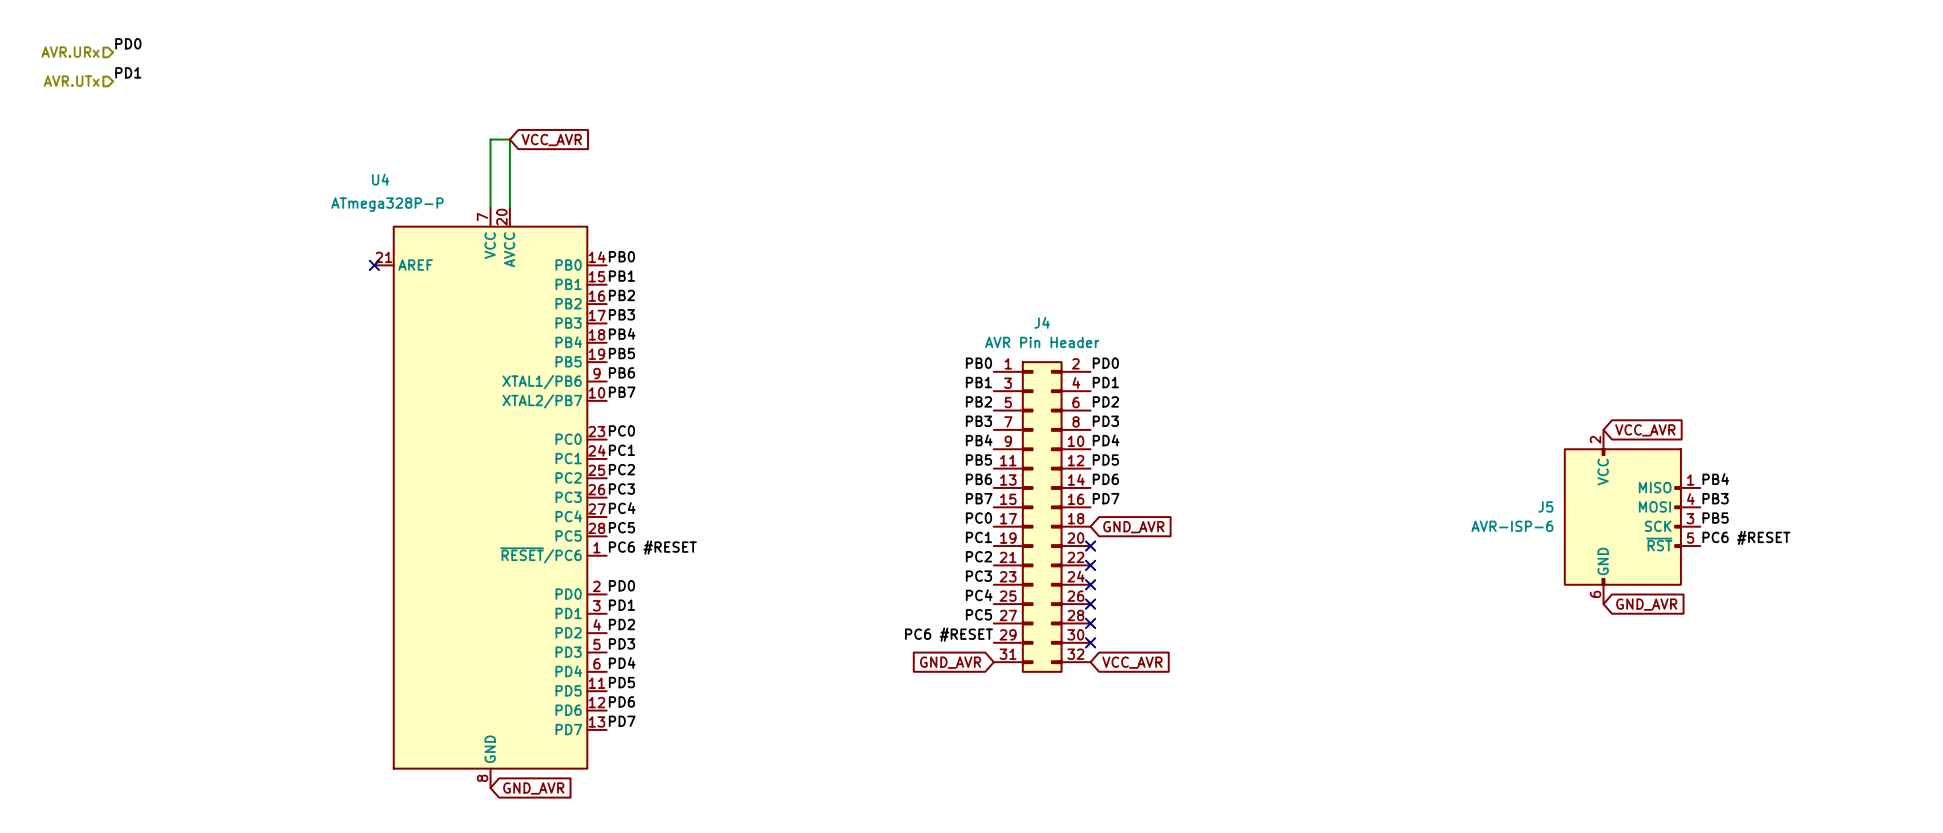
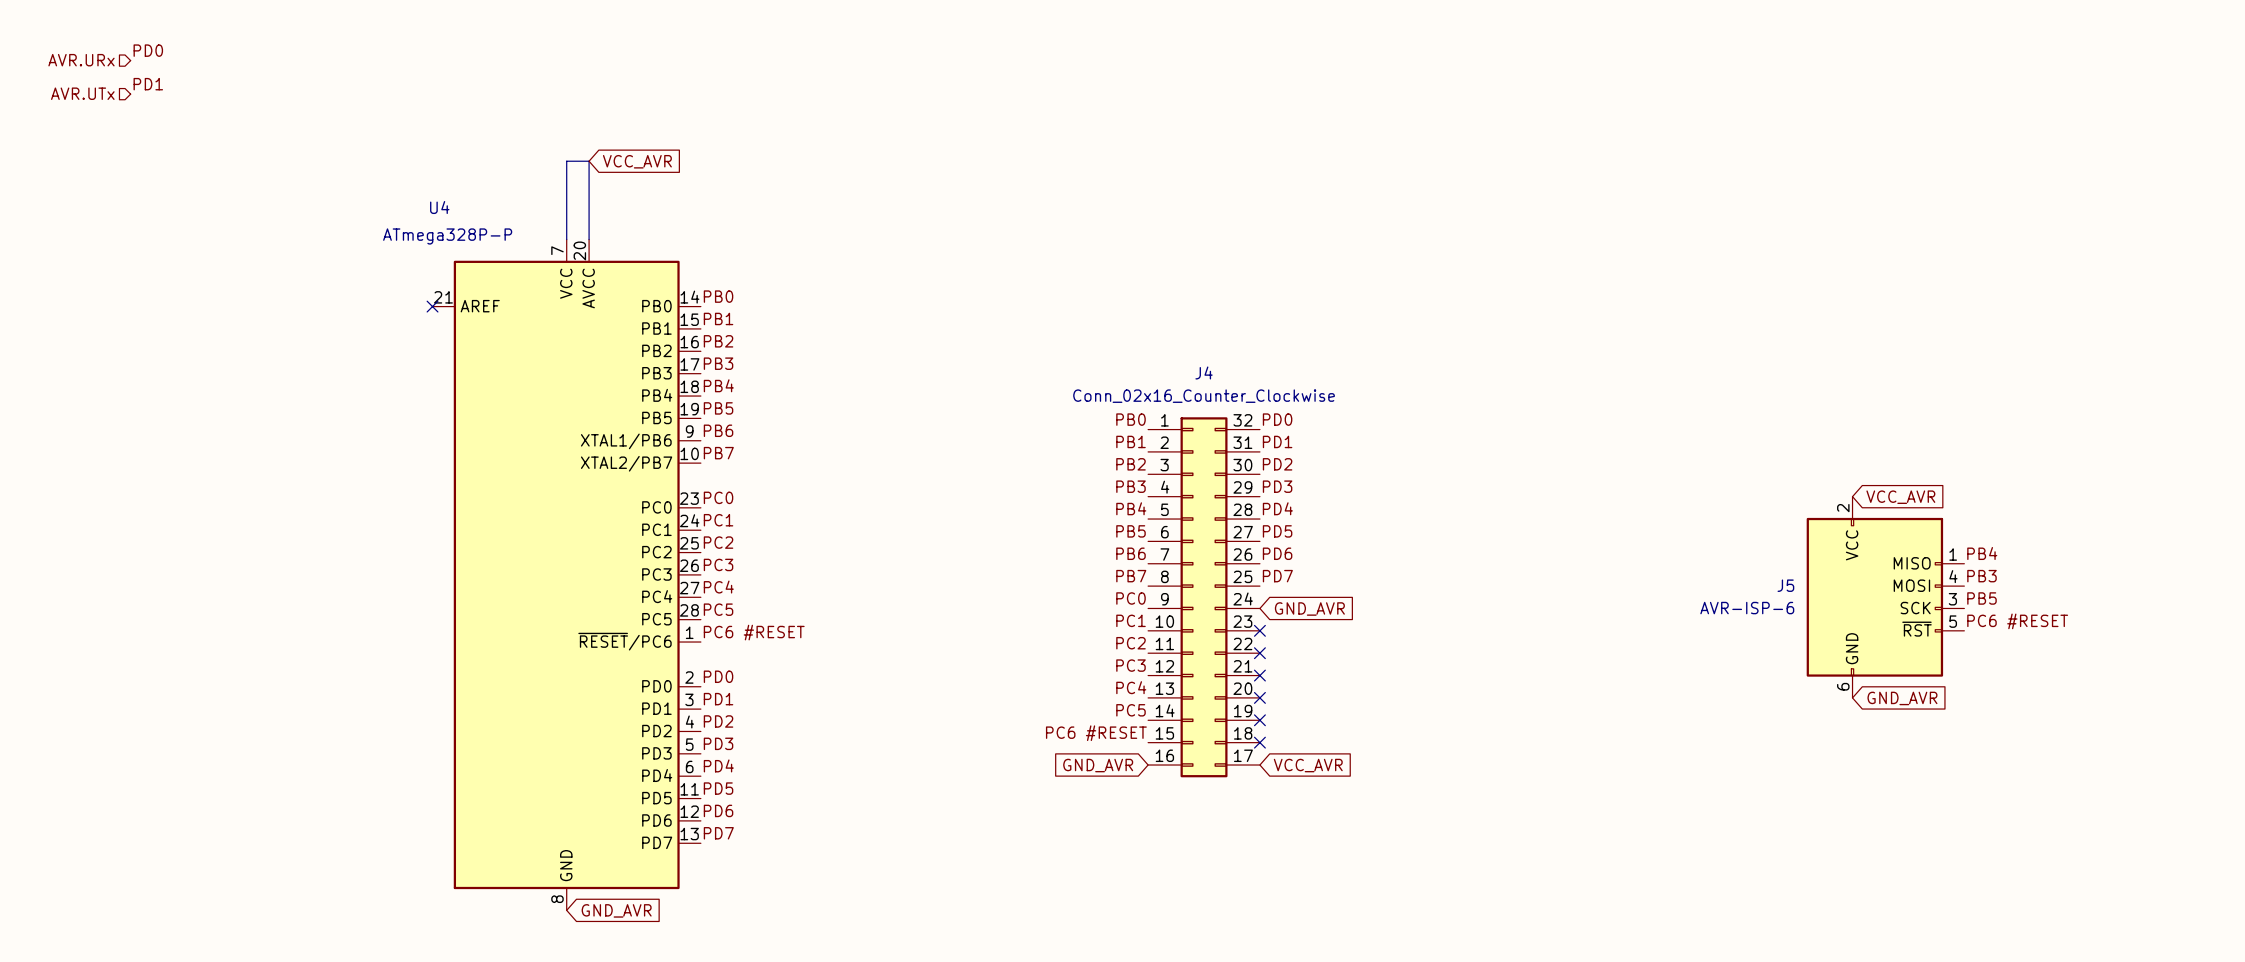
J4 value: AVR Pin Header (1042, 342) -> Conn_02x16_Counter_Clockwise (1204, 396)
J4 symbol: [993, 361, 1091, 673] -> [1148, 417, 1260, 778]

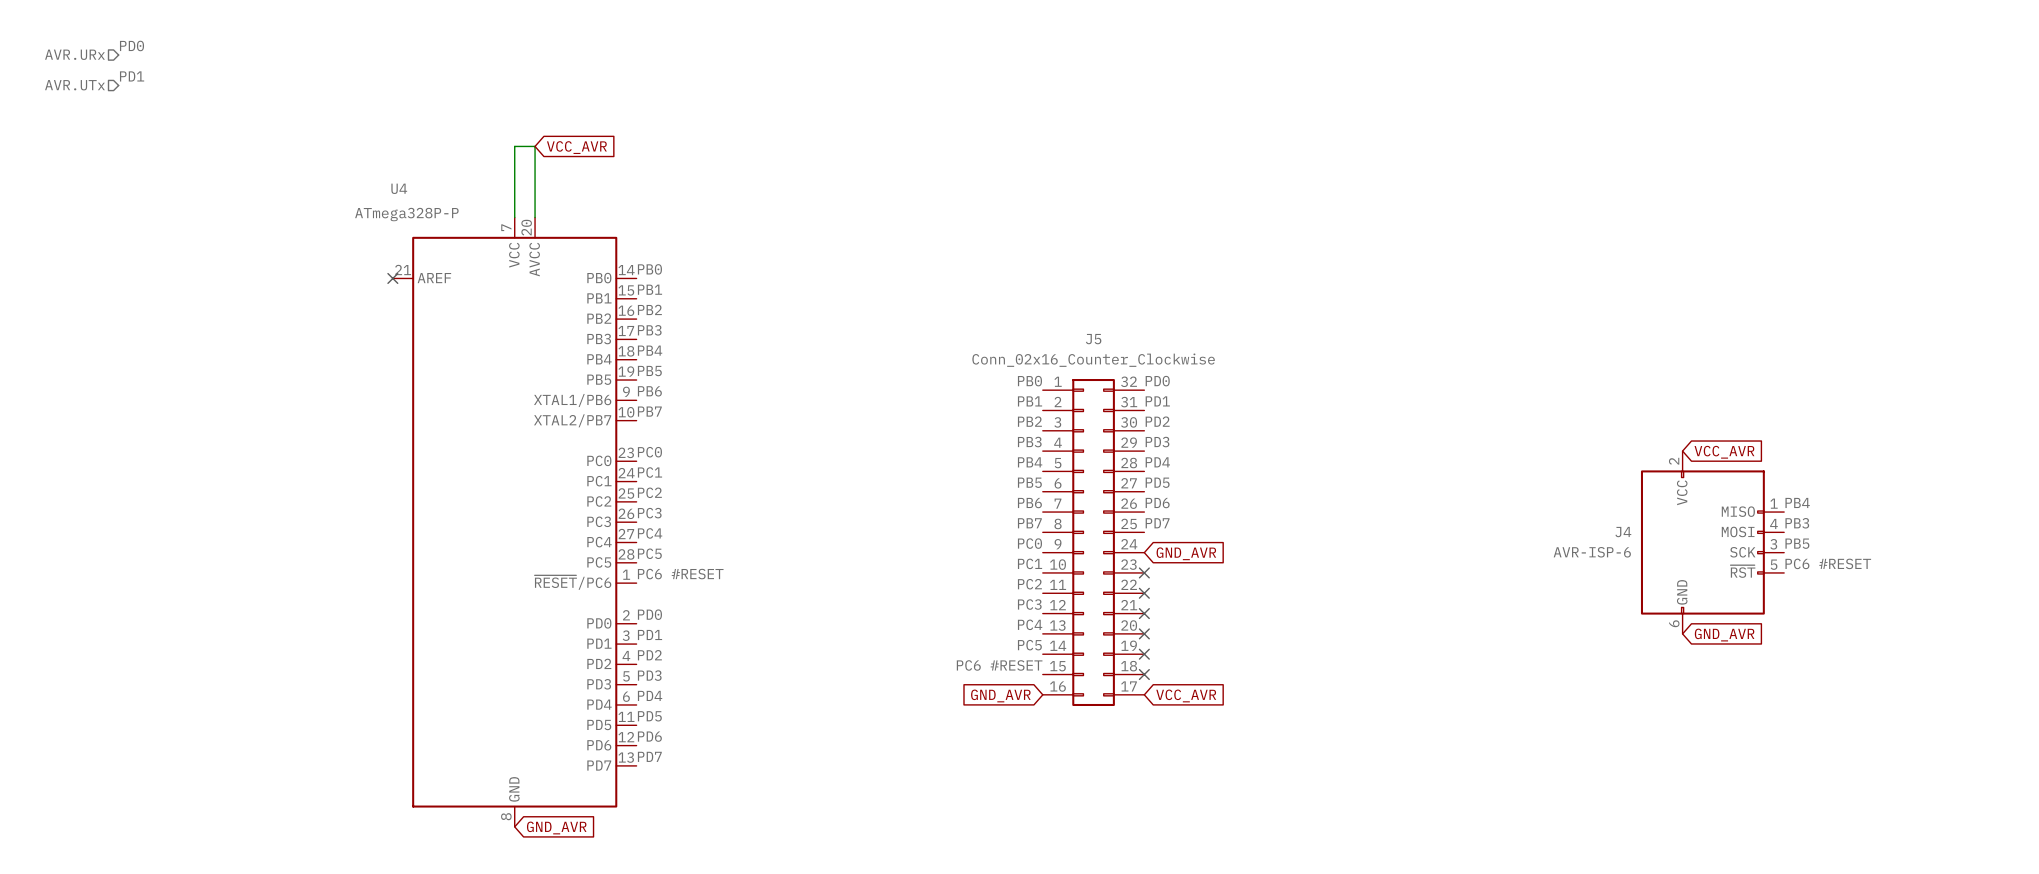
J4 name: J4 (1204, 372) -> J5 (1093, 339)
J5 name: J5 (1785, 585) -> J4 (1623, 532)

